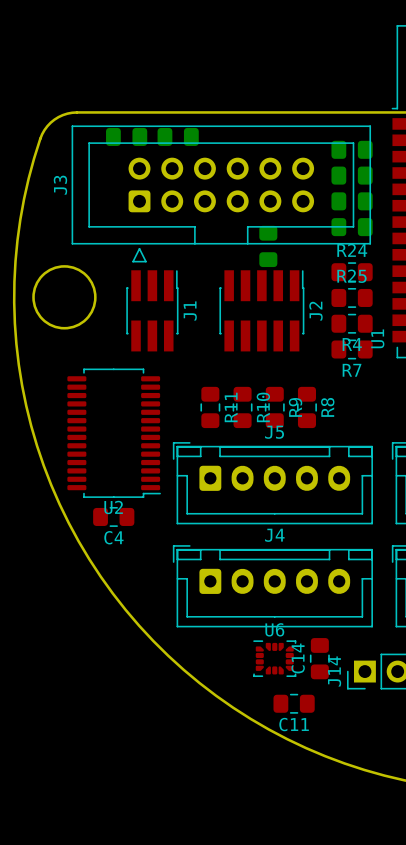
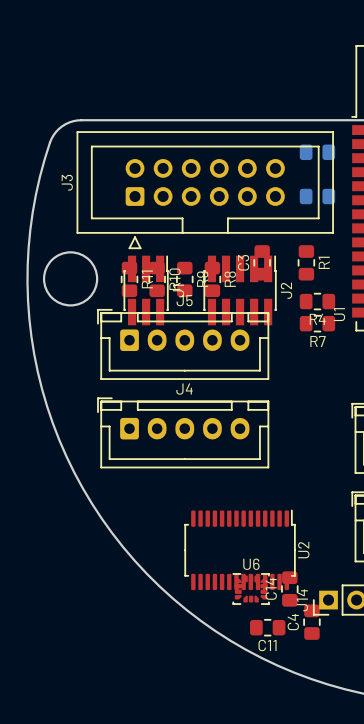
part: (126, 136) -> none
part: (178, 136) -> none
R1 side: bottom (352, 175) -> top (306, 262)
C3 side: bottom (352, 227) -> top (262, 262)
part: (268, 246) -> none
R24: (352, 272) -> none
R25: (352, 297) -> none
R11 position: (210, 407) -> (129, 279)
R10 position: (242, 407) -> (157, 279)
R9 position: (274, 407) -> (184, 279)
R8 position: (306, 407) -> (212, 279)
U2 rotation: 0° (114, 433) -> 90° counterclockwise (240, 549)
U2 position: (114, 433) -> (240, 549)
J5 position: (272, 483) -> (183, 344)
C4 rotation: 0° (113, 516) -> 90° clockwise (311, 622)
C4 position: (113, 516) -> (311, 622)
J4 position: (272, 586) -> (183, 432)

